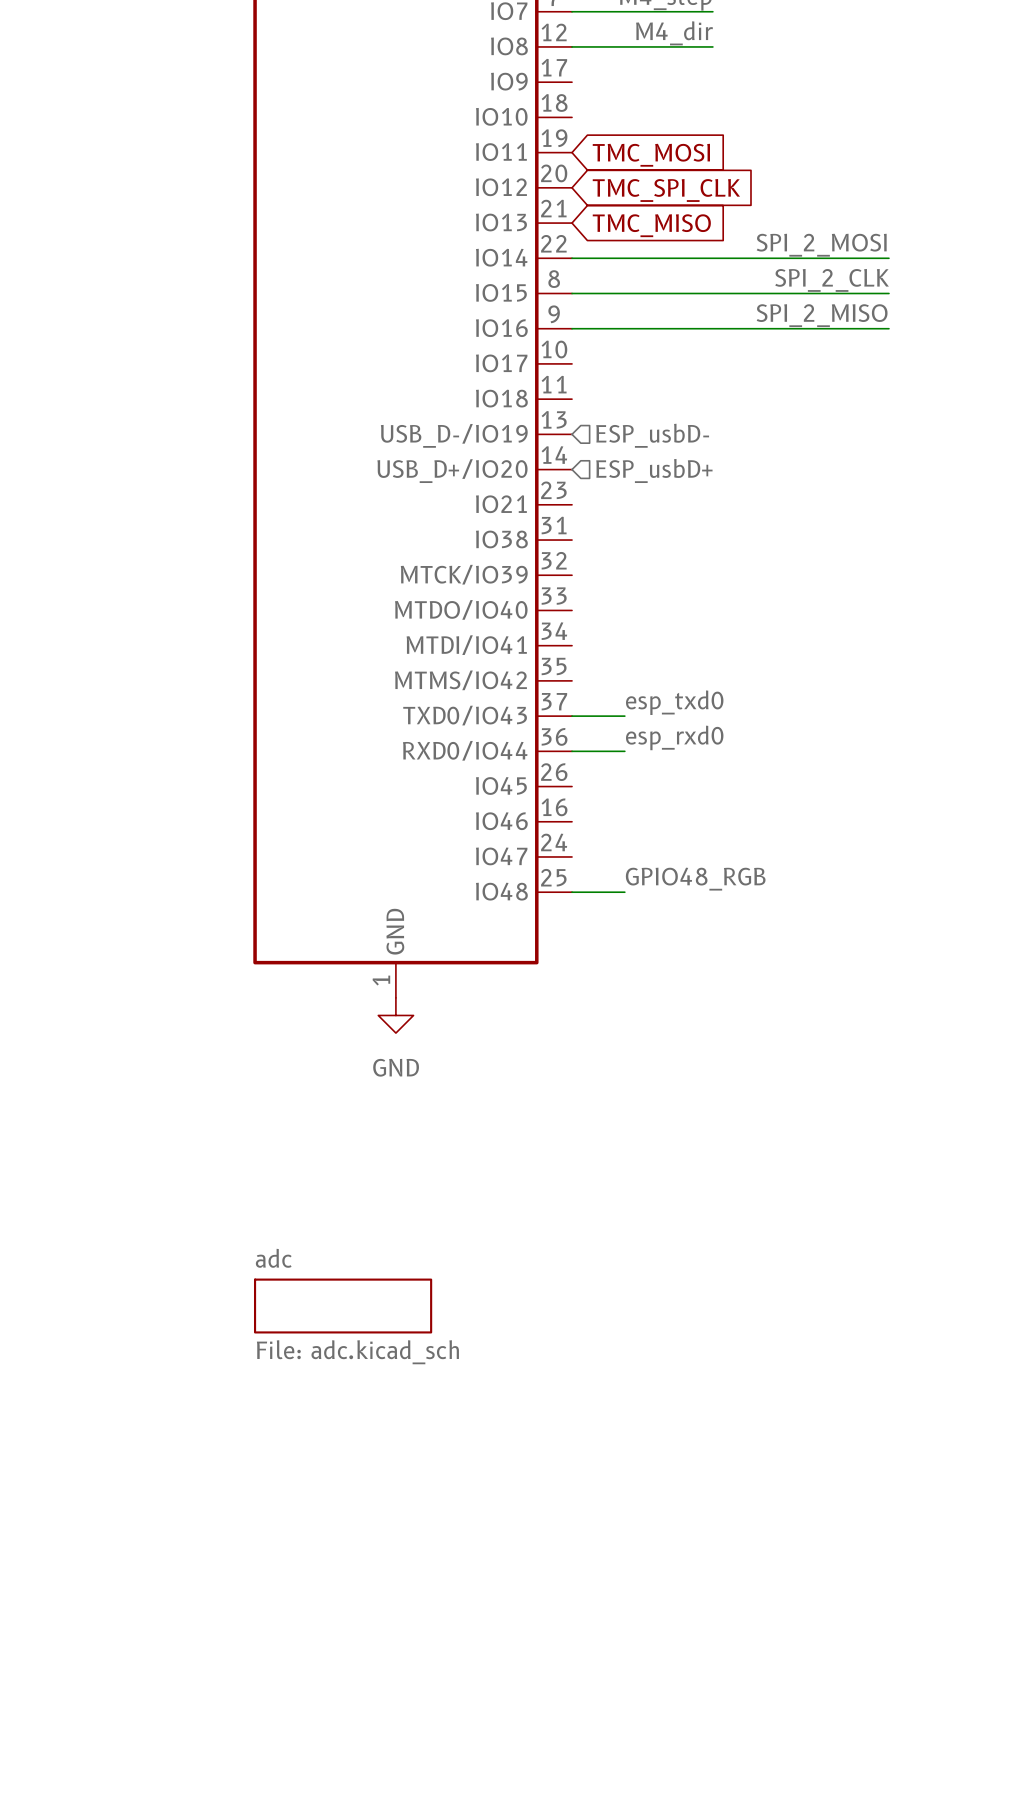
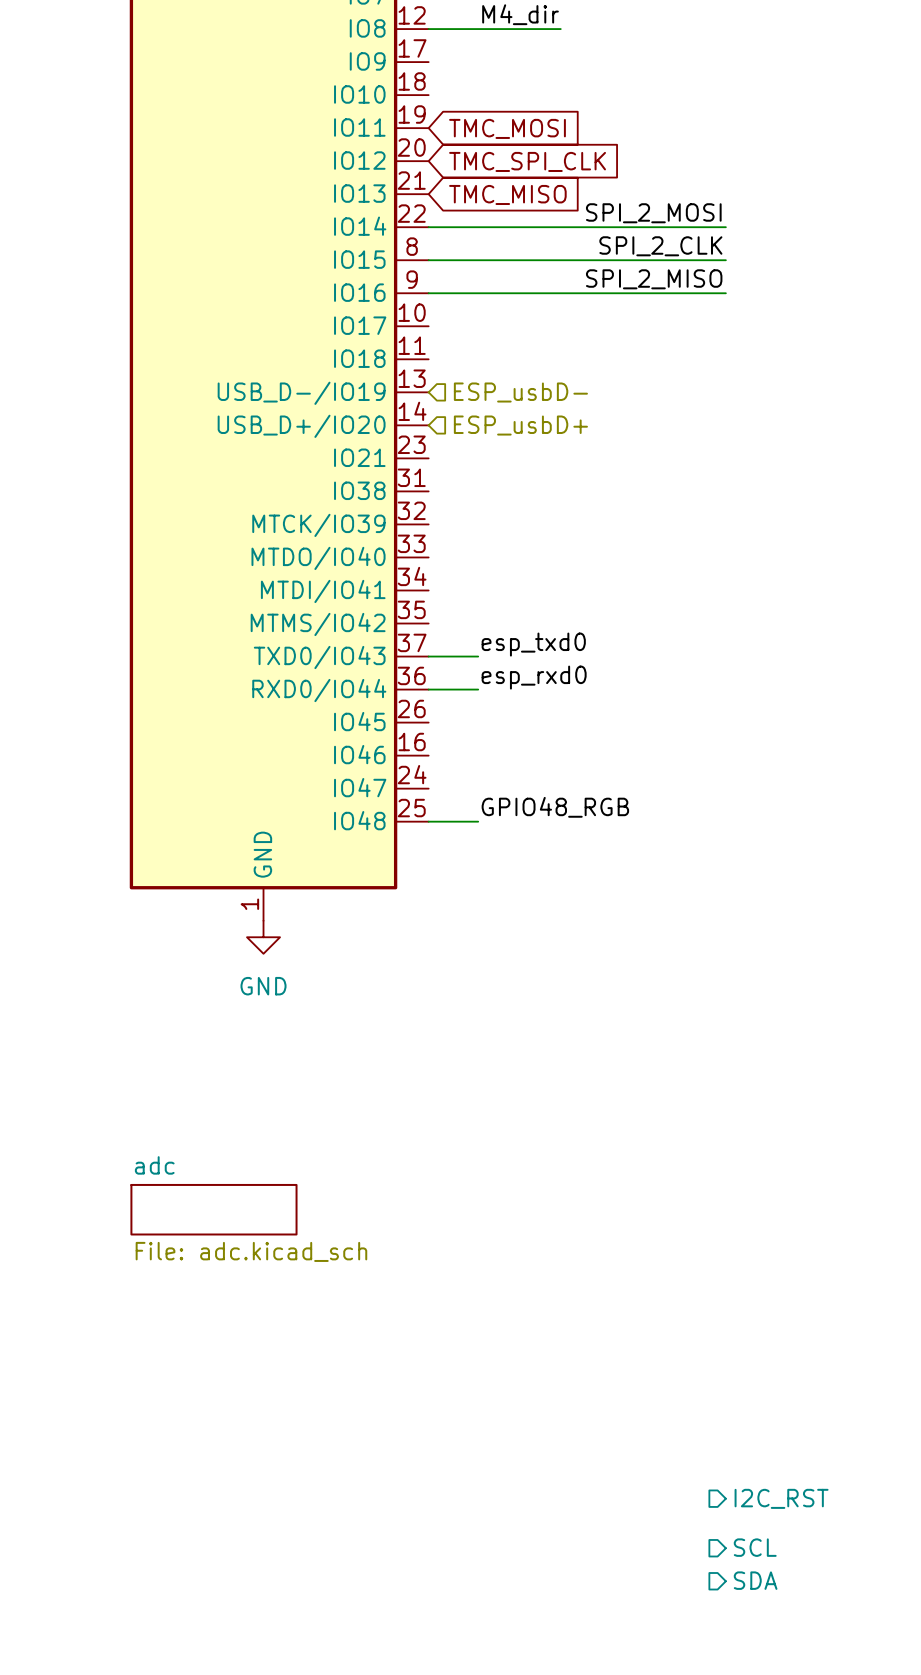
sheet pin: none -> I2C_RST (781, 1498)
sheet pin: none -> SCL (755, 1547)
sheet pin: none -> SDA (755, 1580)

